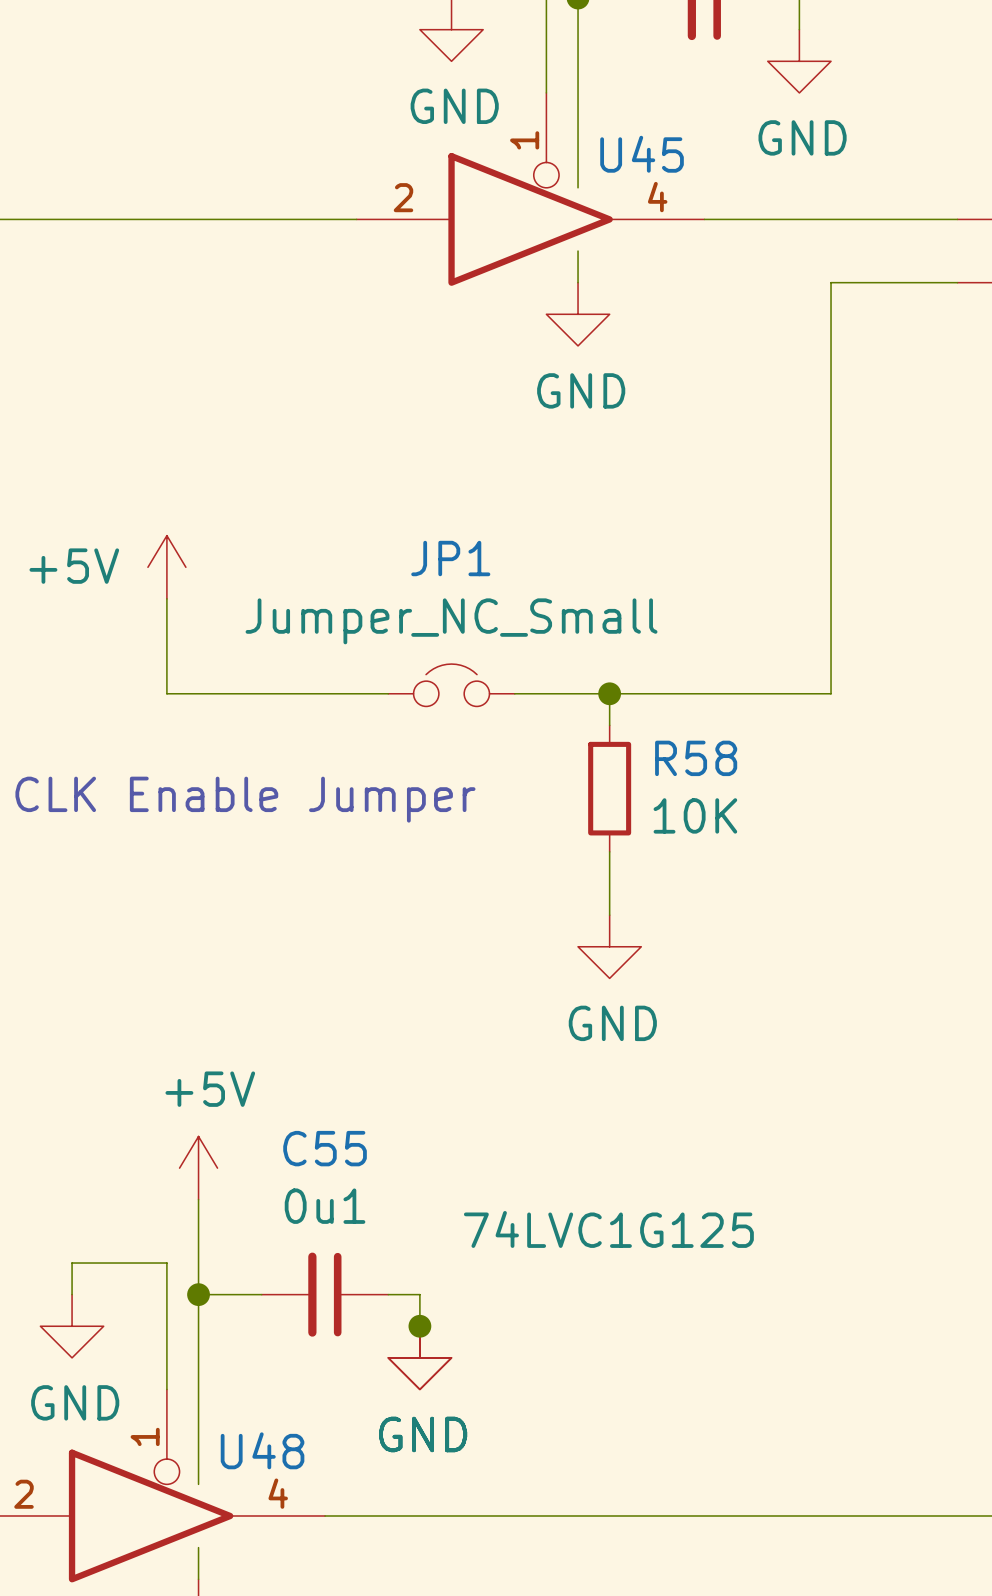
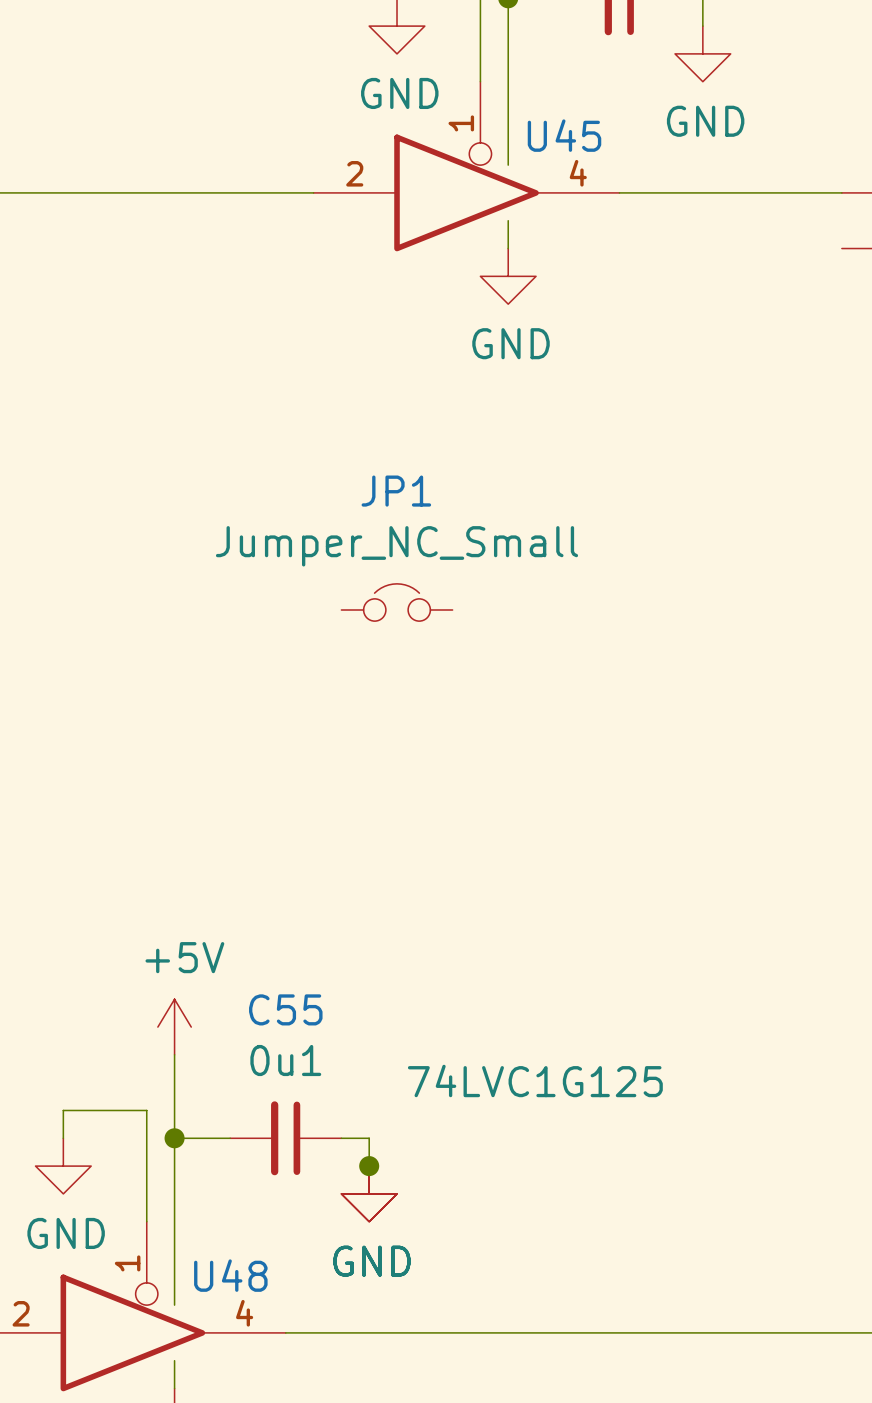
wire: (957, 282) (831, 282) (831, 693) (514, 693) -> none
power symbol: +5V (166, 567) -> none
wire: (166, 598) (166, 693) (388, 693) -> none
wire: (609, 693) (609, 725) -> none
junction: (609, 693) -> none
R58: 10K (609, 788) -> none
text: CLK Enable Jumper (245, 799) -> none
wire: (609, 851) (609, 915) -> none
power symbol: GND (609, 946) -> none

